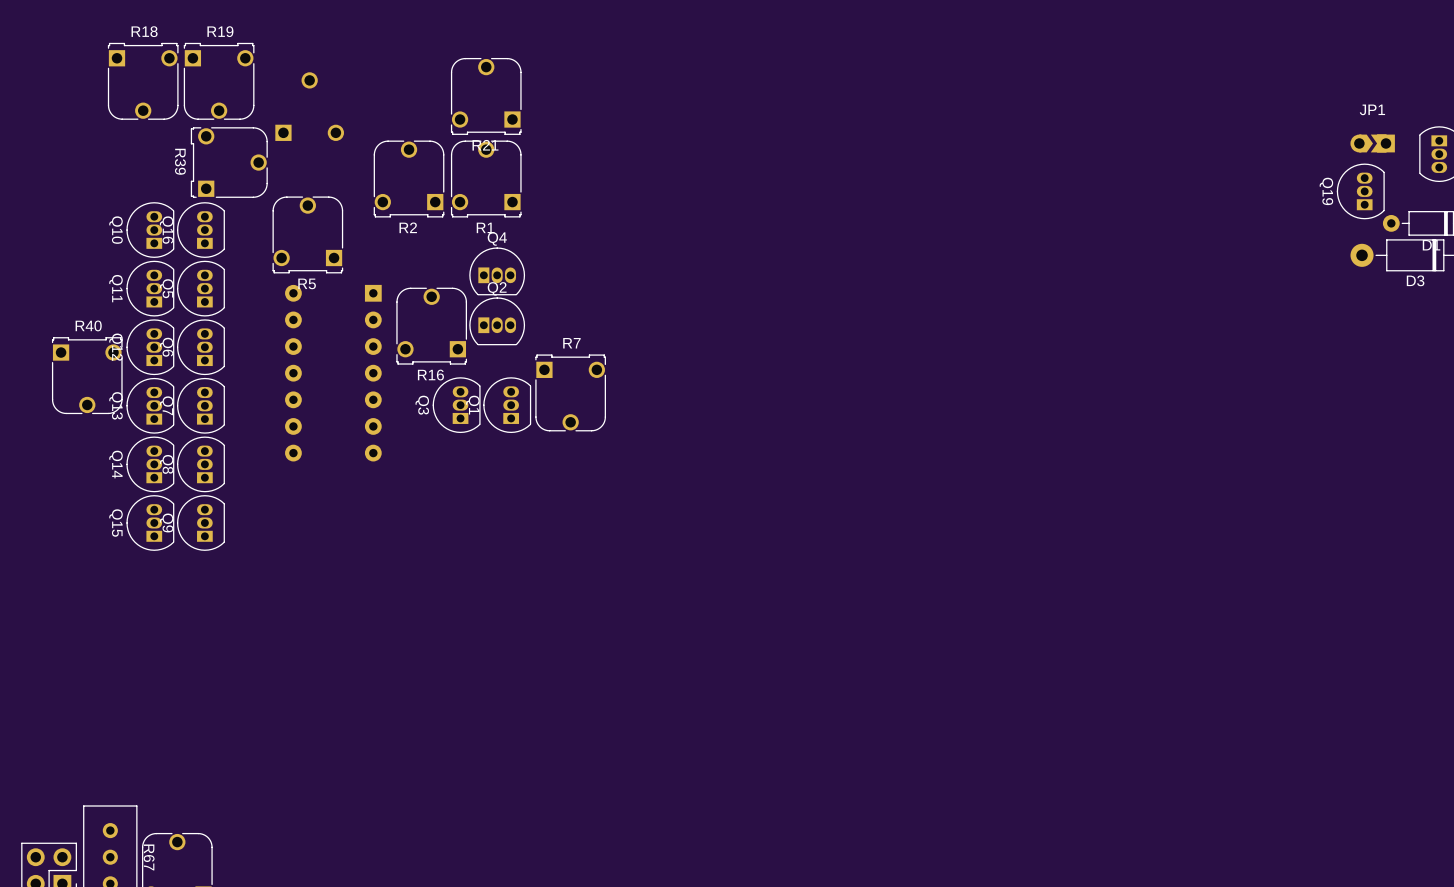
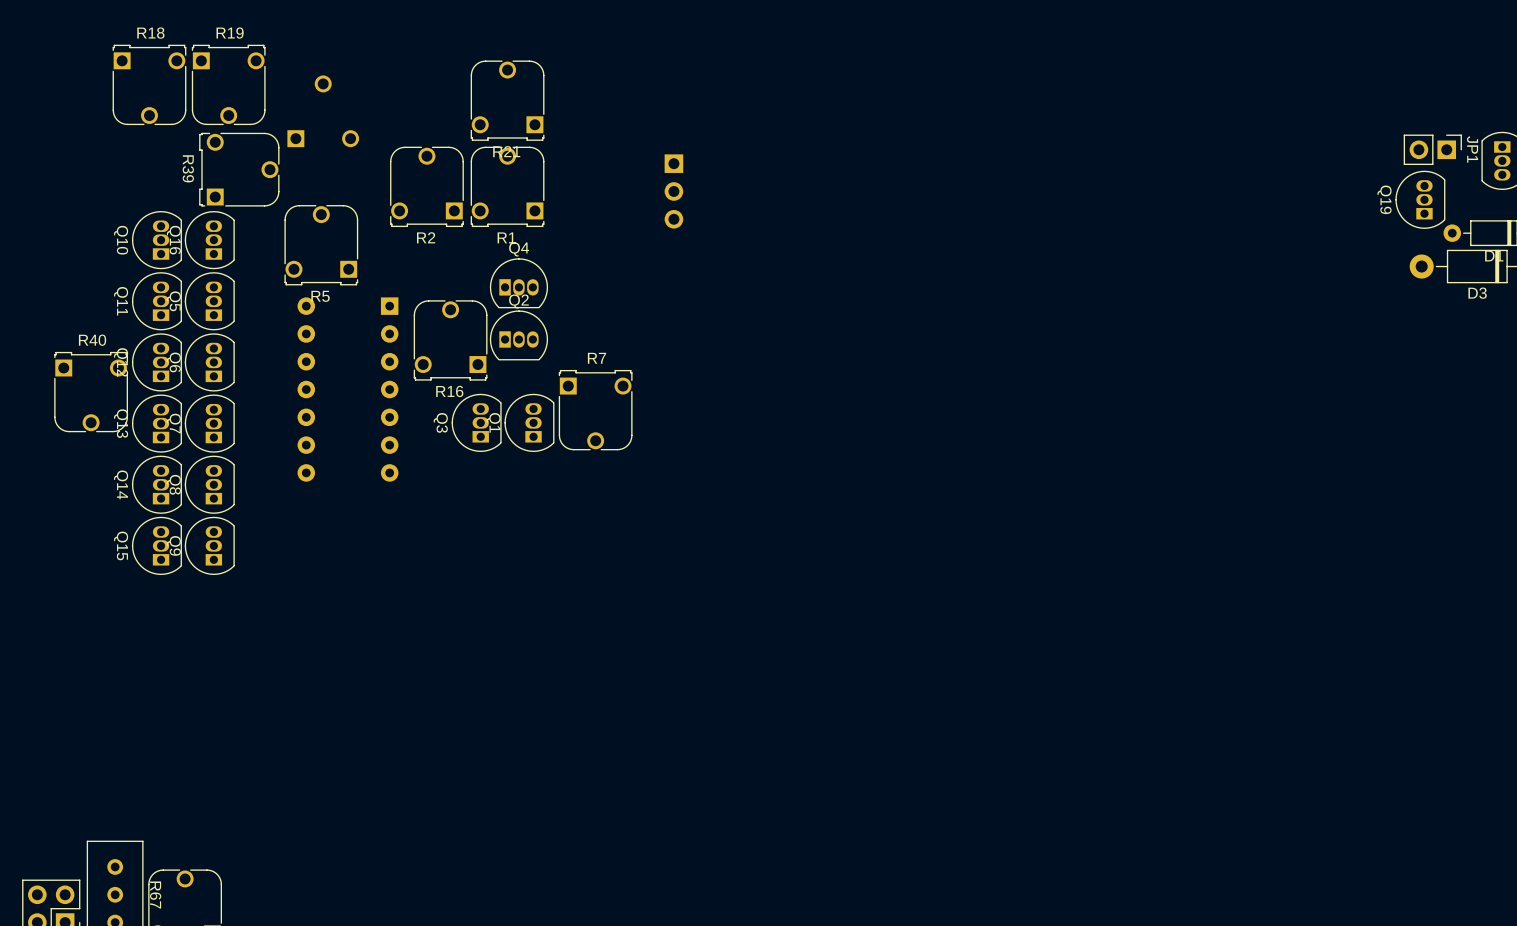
JP1 name position: JP1 (1372, 109) -> JP1 (1472, 149)
JP1 footprint: [1350, 134, 1395, 153] -> [1403, 134, 1462, 165]
part: none -> (673, 191)

